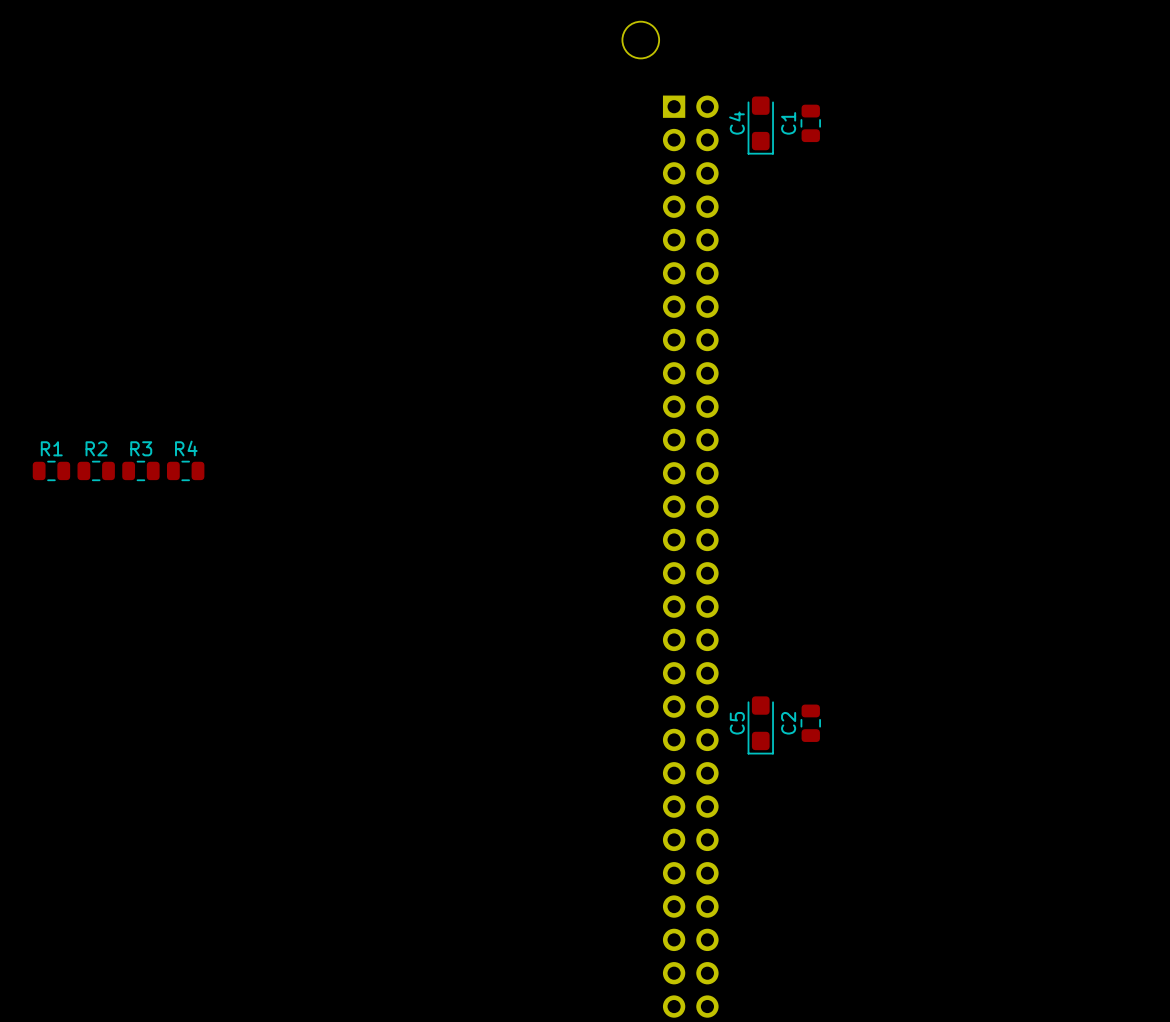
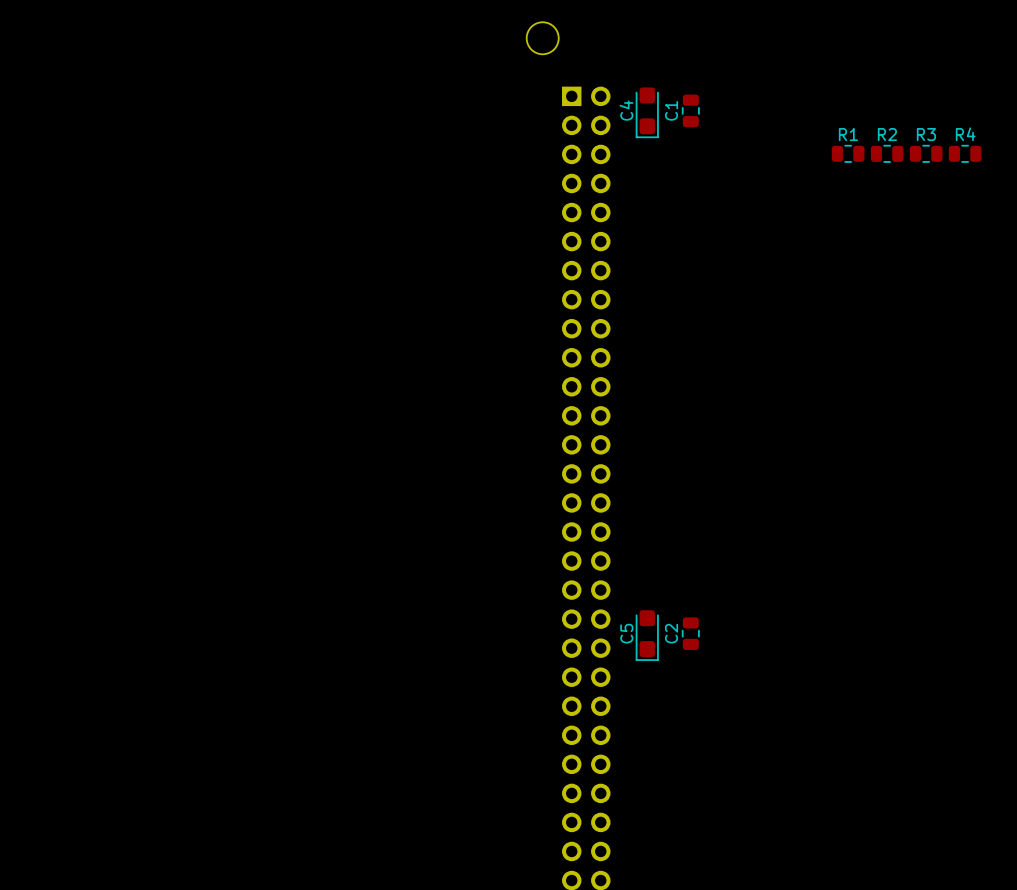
R1 position: (51, 470) -> (848, 153)
R2 position: (96, 470) -> (887, 153)
R3 position: (140, 470) -> (926, 153)
R4 position: (185, 470) -> (965, 153)

